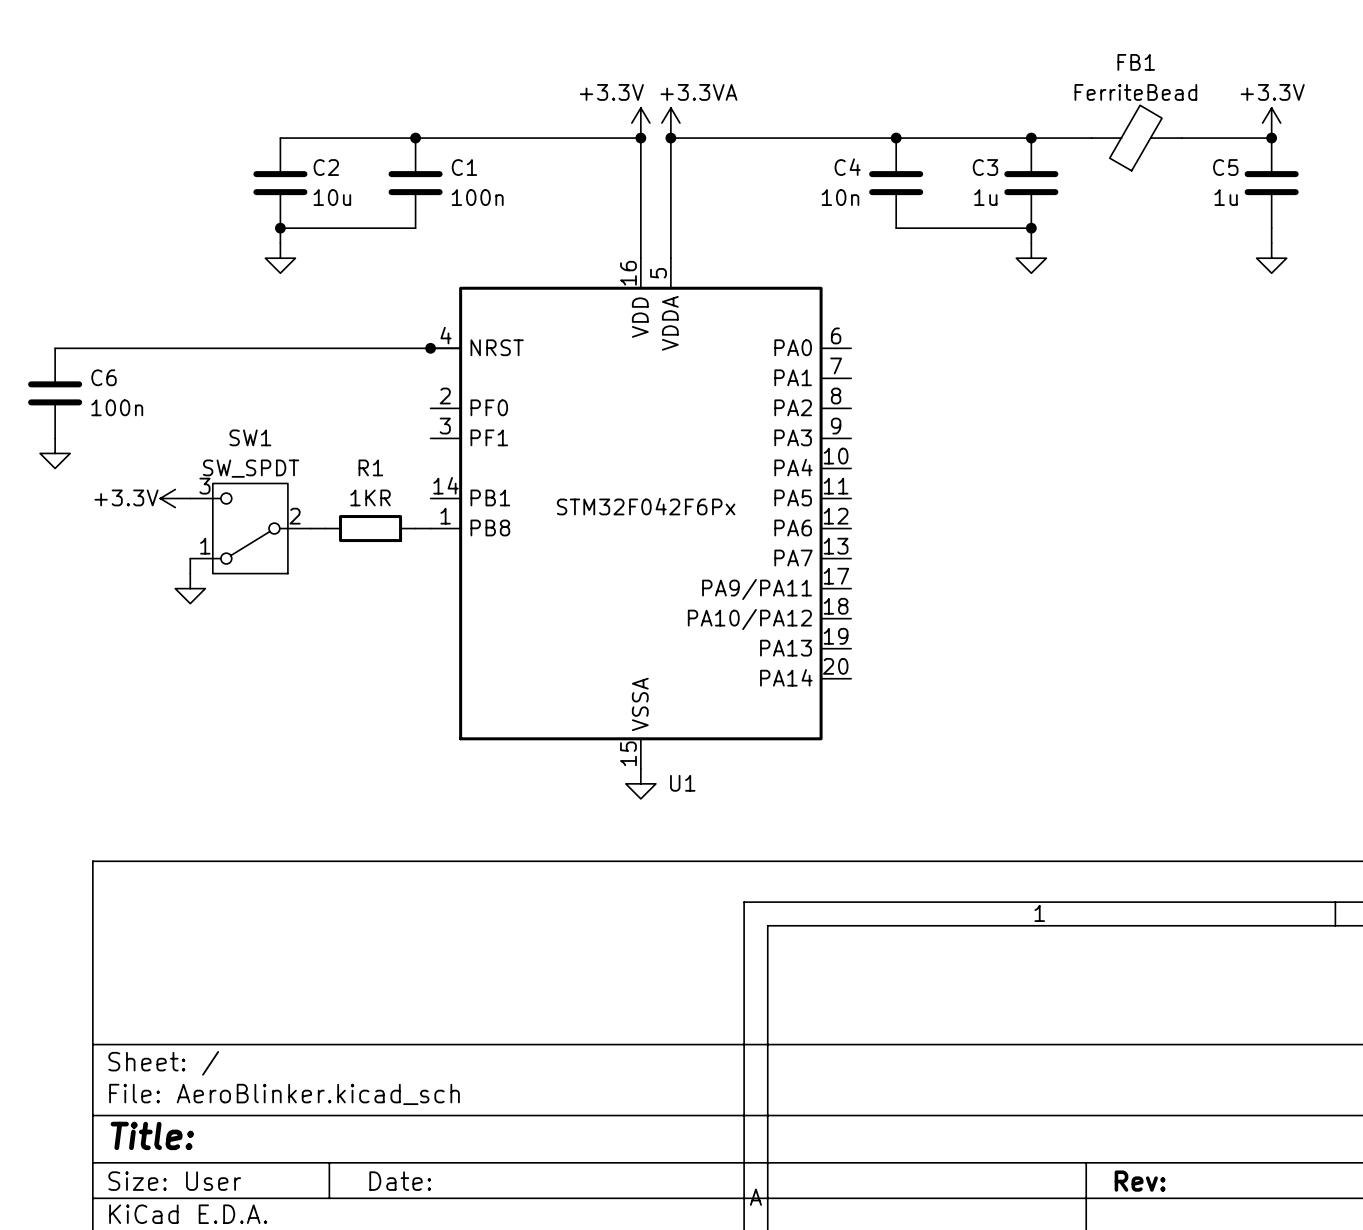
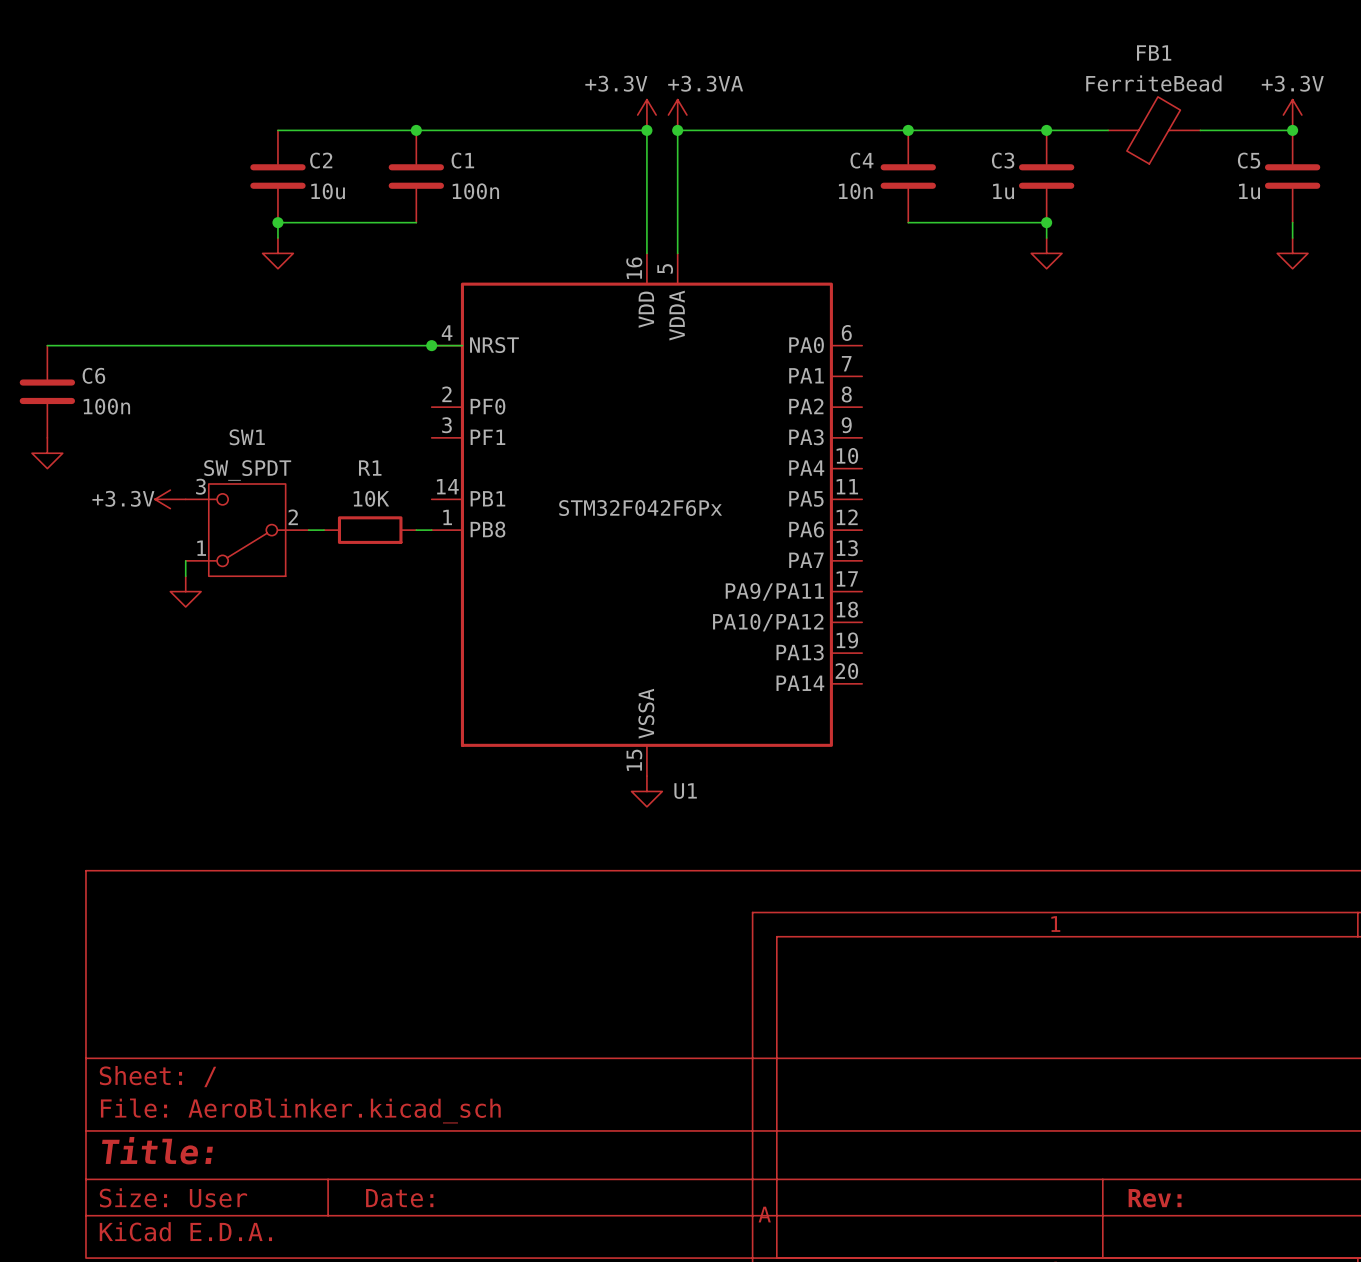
R1 value: 1KR (370, 497) -> 10K (371, 498)

